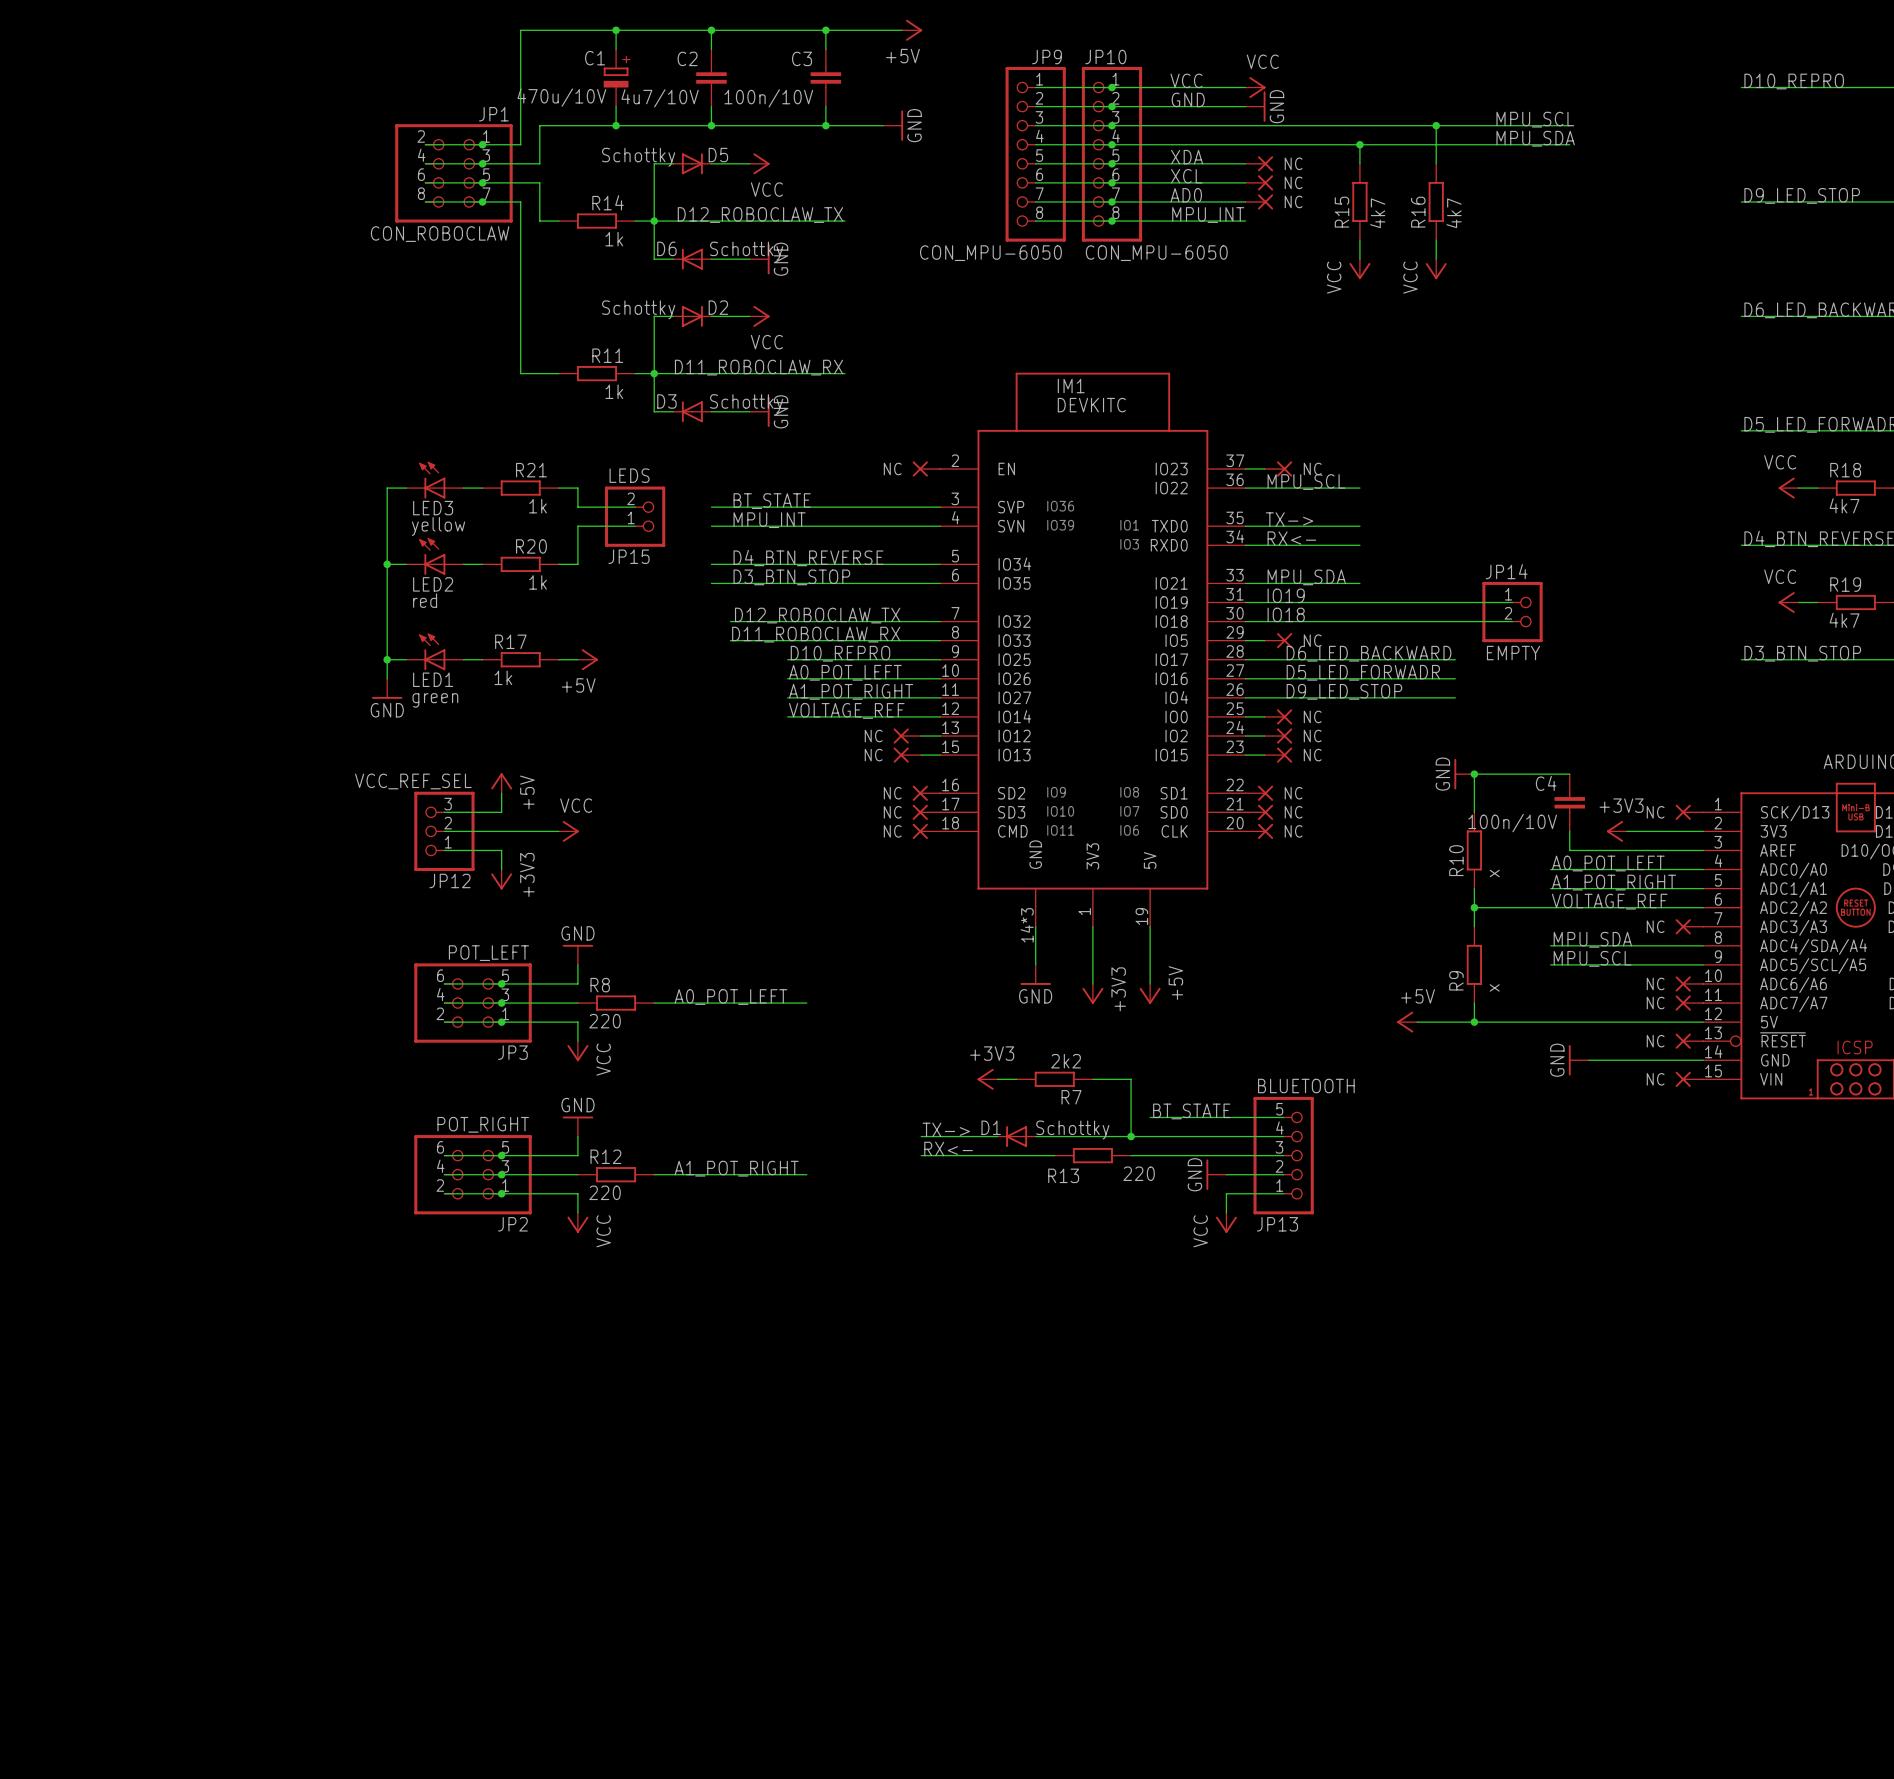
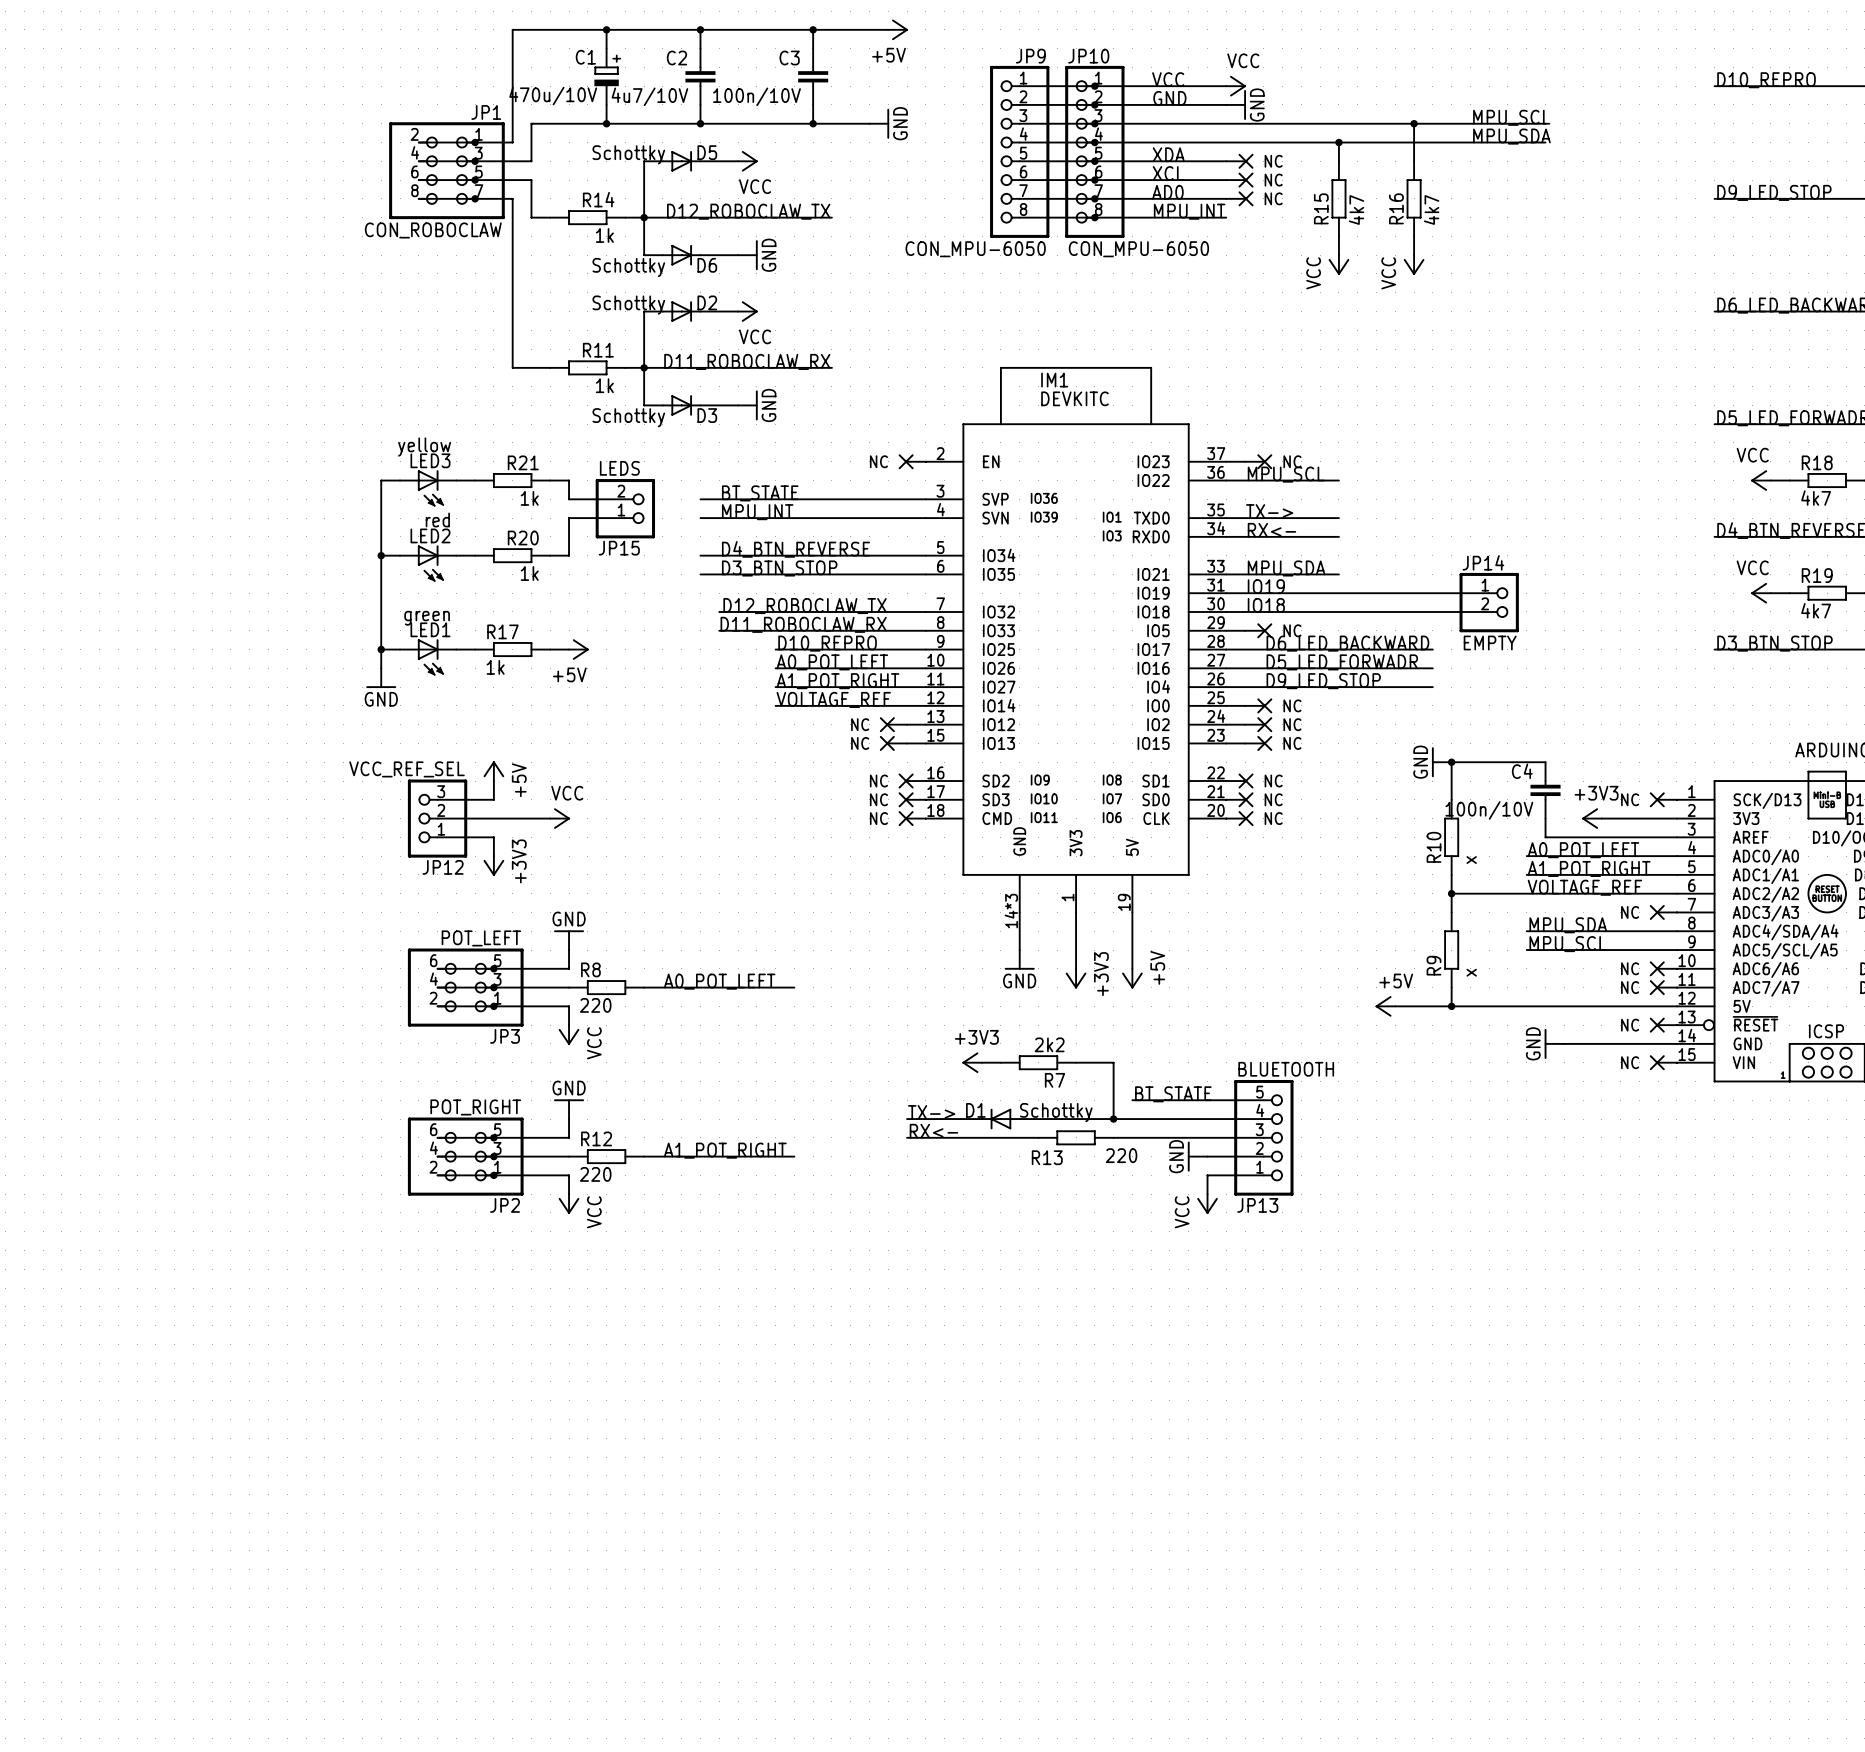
D6 rotation: 0° (692, 259) -> 180° (681, 255)
D3 rotation: 0° (692, 411) -> 180° (681, 405)
LED3 rotation: 0° (432, 480) -> 180° (430, 488)
LED2 rotation: 0° (432, 556) -> 180° (430, 563)
LED1 rotation: 0° (432, 651) -> 180° (430, 657)

